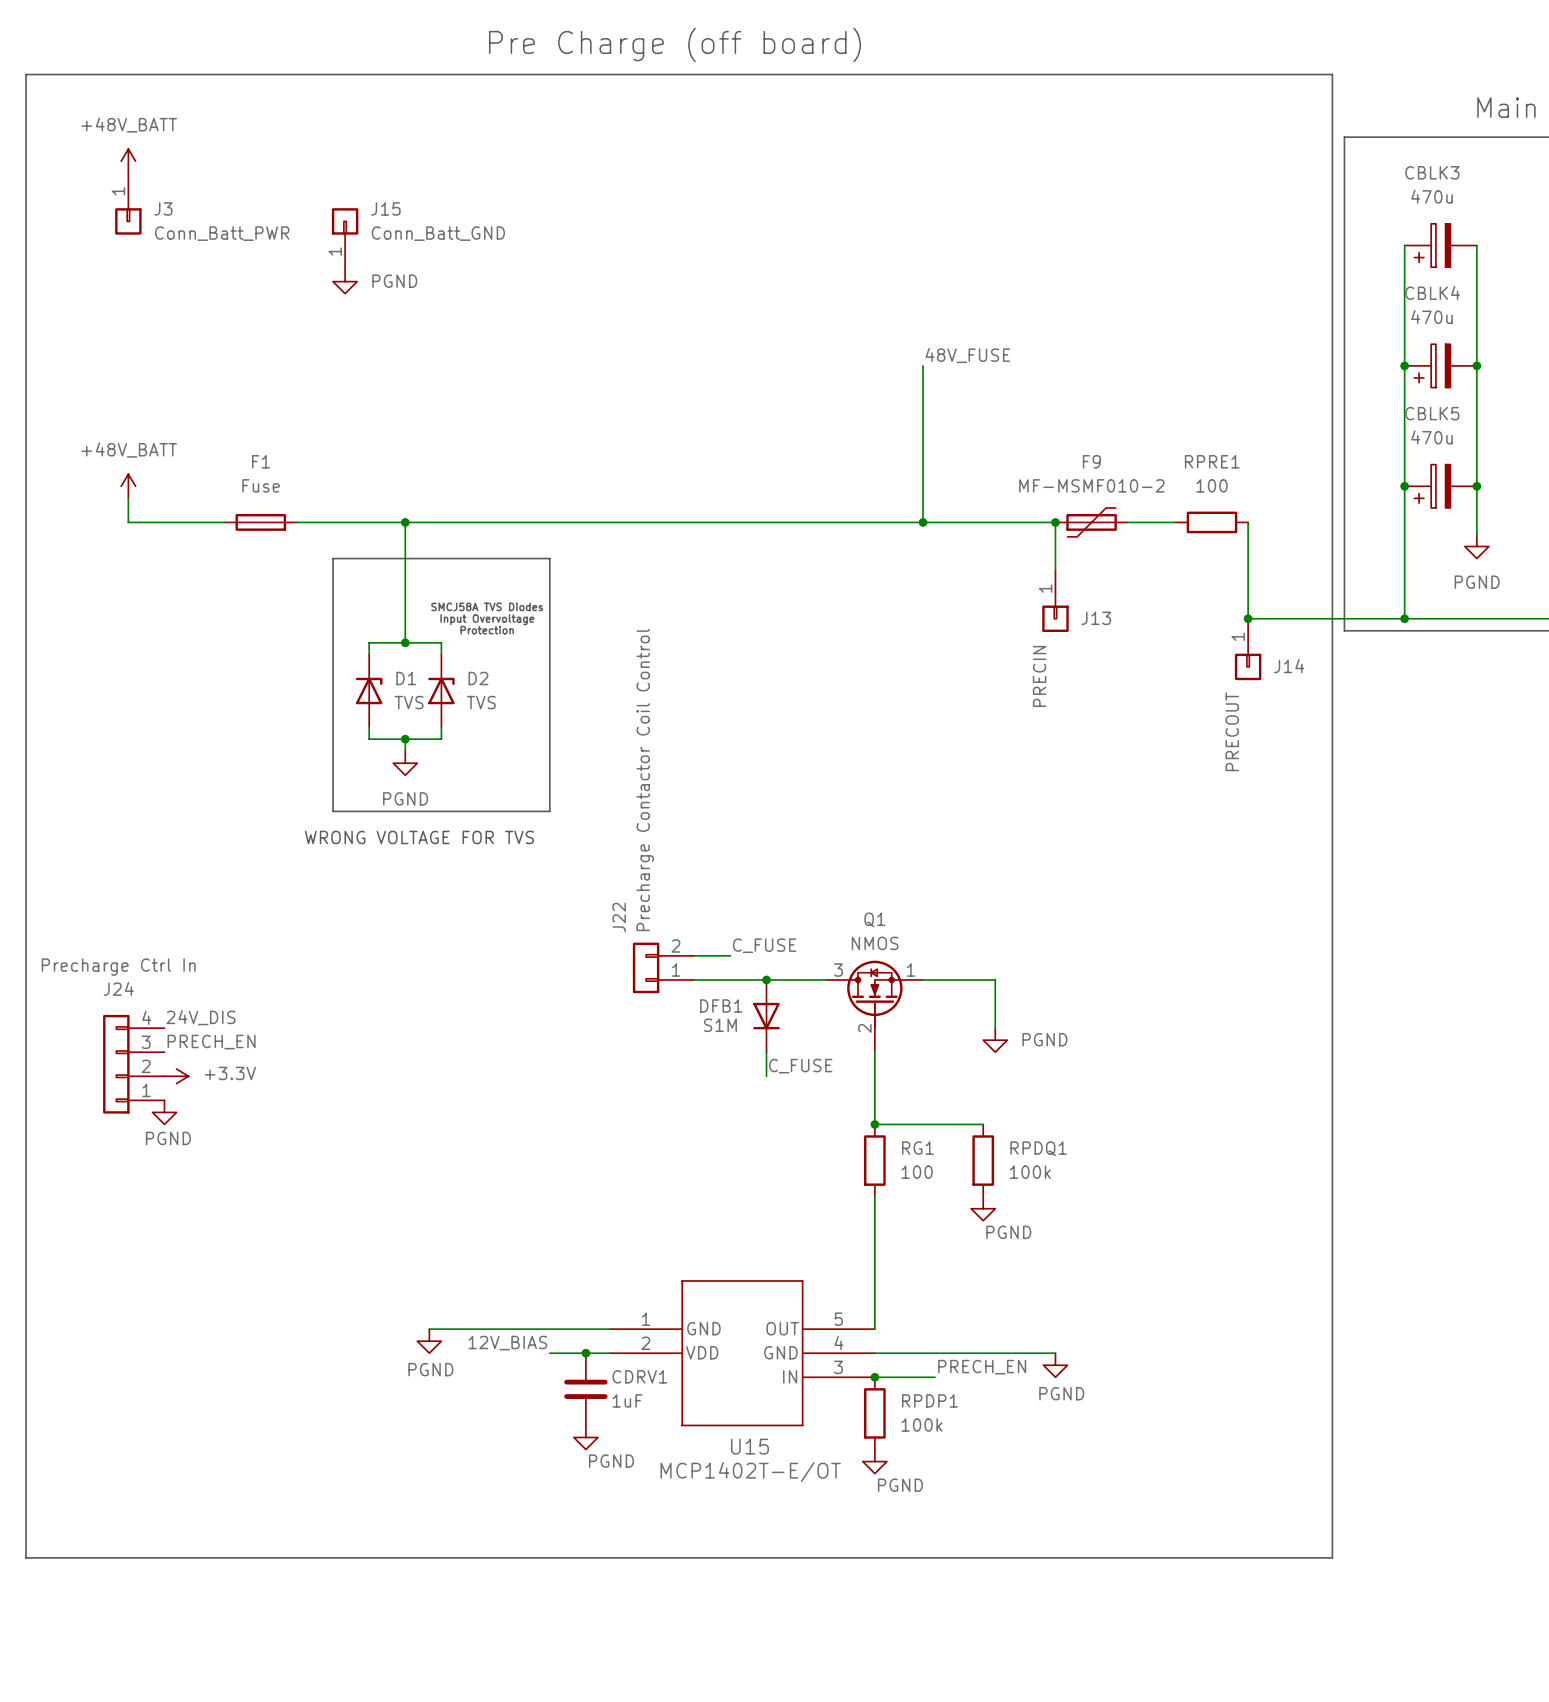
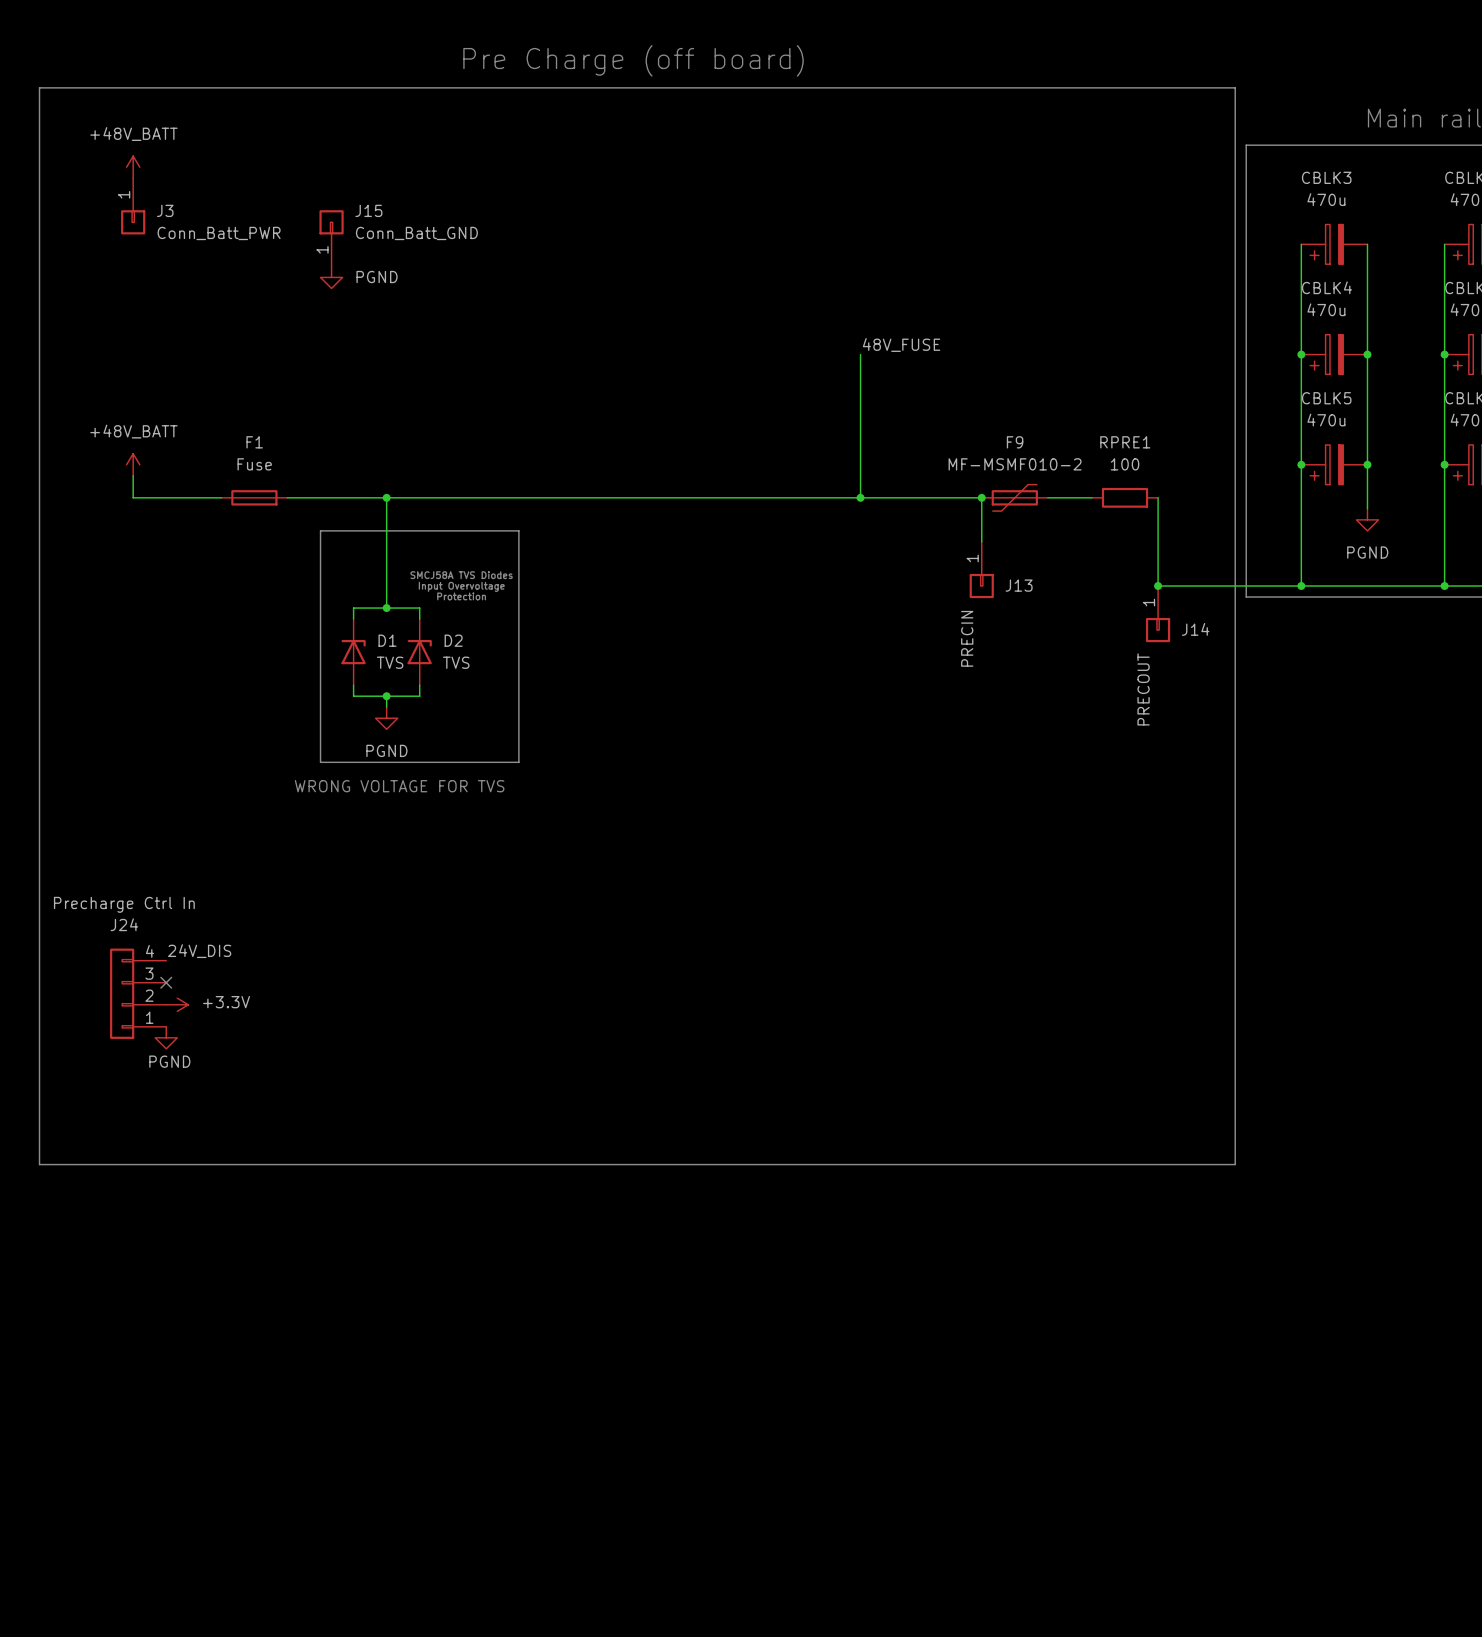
label: C_FUSE (764, 945) -> none
wire: (694, 955) (730, 955) -> none
J22: Precharge Contactor Coil Control (663, 967) -> none
wire: (694, 979) (826, 979) -> none
junction: (766, 979) -> none
wire: (923, 979) (995, 979) (995, 1028) -> none
Q1: NMOS (874, 1006) -> none
DFB1: S1M (766, 1016) -> none
power symbol: PGND (995, 1040) -> none
label: PRECH_EN (211, 1042) -> none
no-connect mark: none -> (166, 982)
wire: (766, 1052) (766, 1076) -> none
wire: (874, 1052) (874, 1124) (983, 1124) -> none
label: C_FUSE (800, 1066) -> none
junction: (874, 1124) -> none
RG1: 100 (874, 1160) -> none
RPDQ1: 100k (983, 1160) -> none
wire: (874, 1196) (874, 1329) -> none
power symbol: PGND (983, 1208) -> none
line: (26, 1250) (26, 1557) (1332, 1557) (1332, 1250) -> (39, 1164) (1235, 1164)
wire: (429, 1329) (609, 1329) -> none
power symbol: PGND (429, 1341) -> none
label: 12V_BIAS (507, 1343) -> none
wire: (549, 1353) (609, 1353) -> none
junction: (585, 1353) -> none
U15: MCP1402T-E/OT (742, 1353) -> none
wire: (874, 1353) (1055, 1353) -> none
power symbol: PGND (1055, 1365) -> none
label: PRECH_EN (982, 1367) -> none
wire: (874, 1377) (935, 1377) -> none
junction: (874, 1377) -> none
CDRV1: 1uF (585, 1389) -> none
RPDP1: 100k (874, 1413) -> none
power symbol: PGND (585, 1437) -> none
power symbol: PGND (874, 1461) -> none

